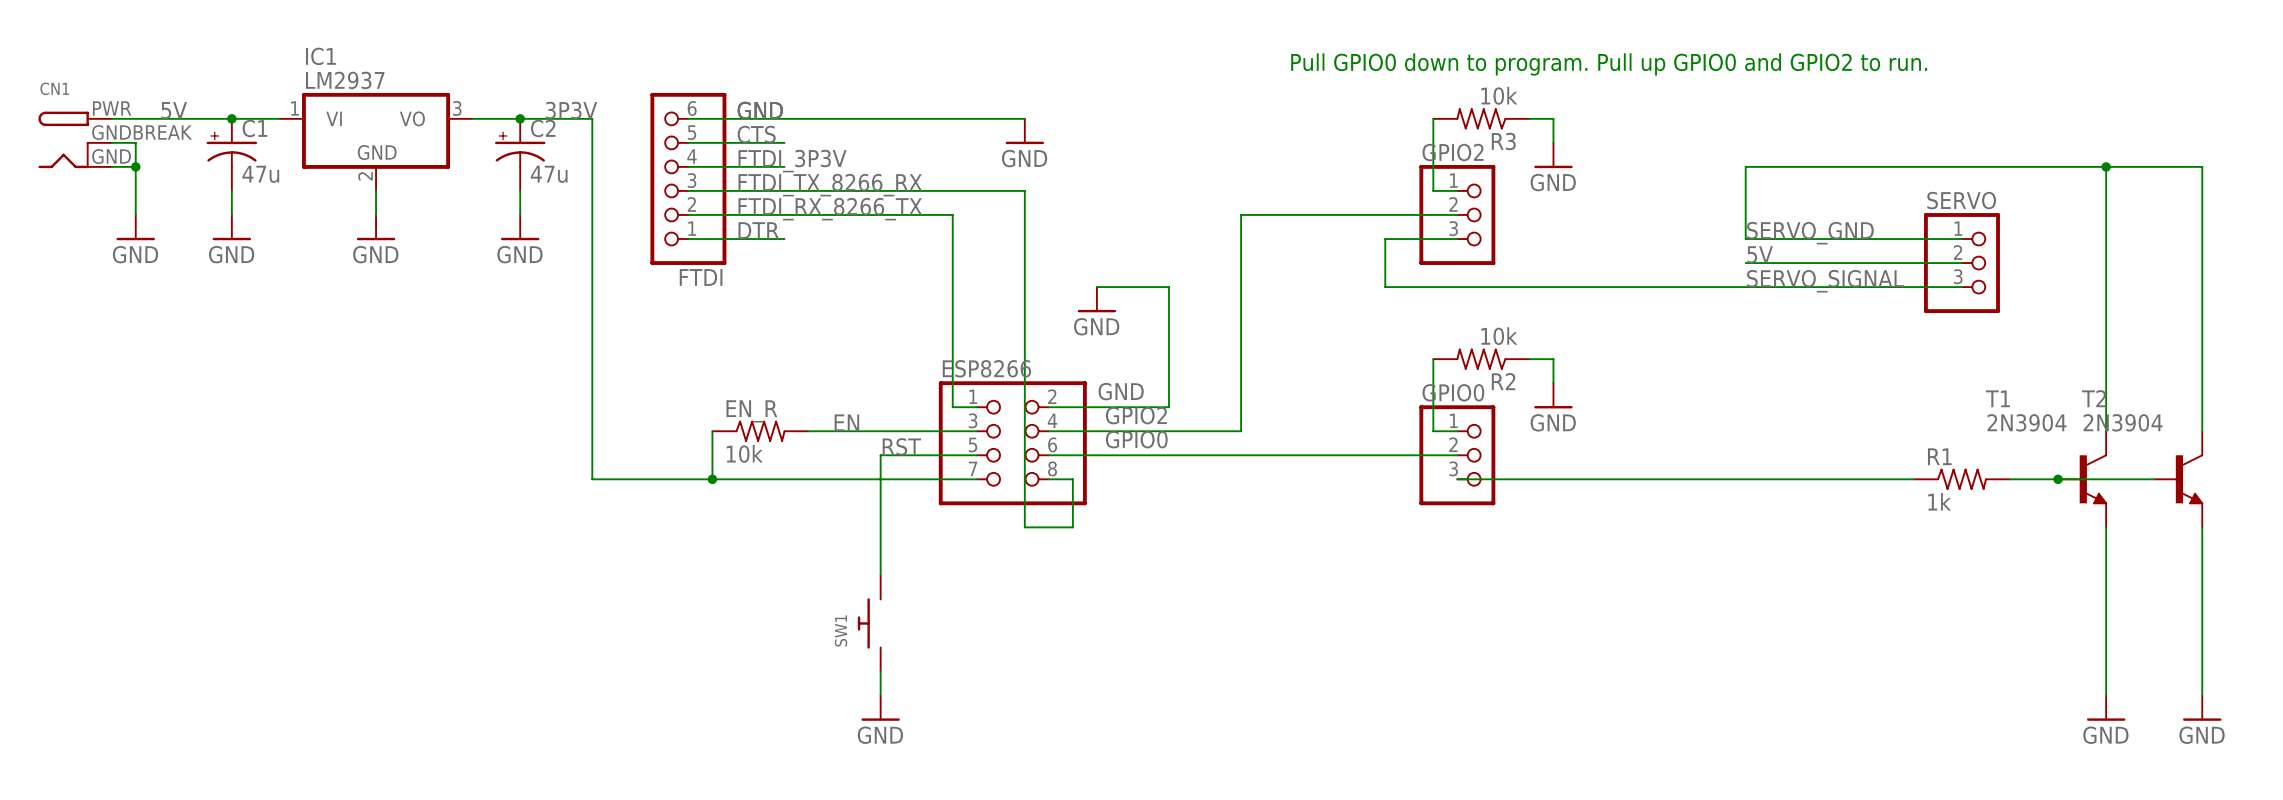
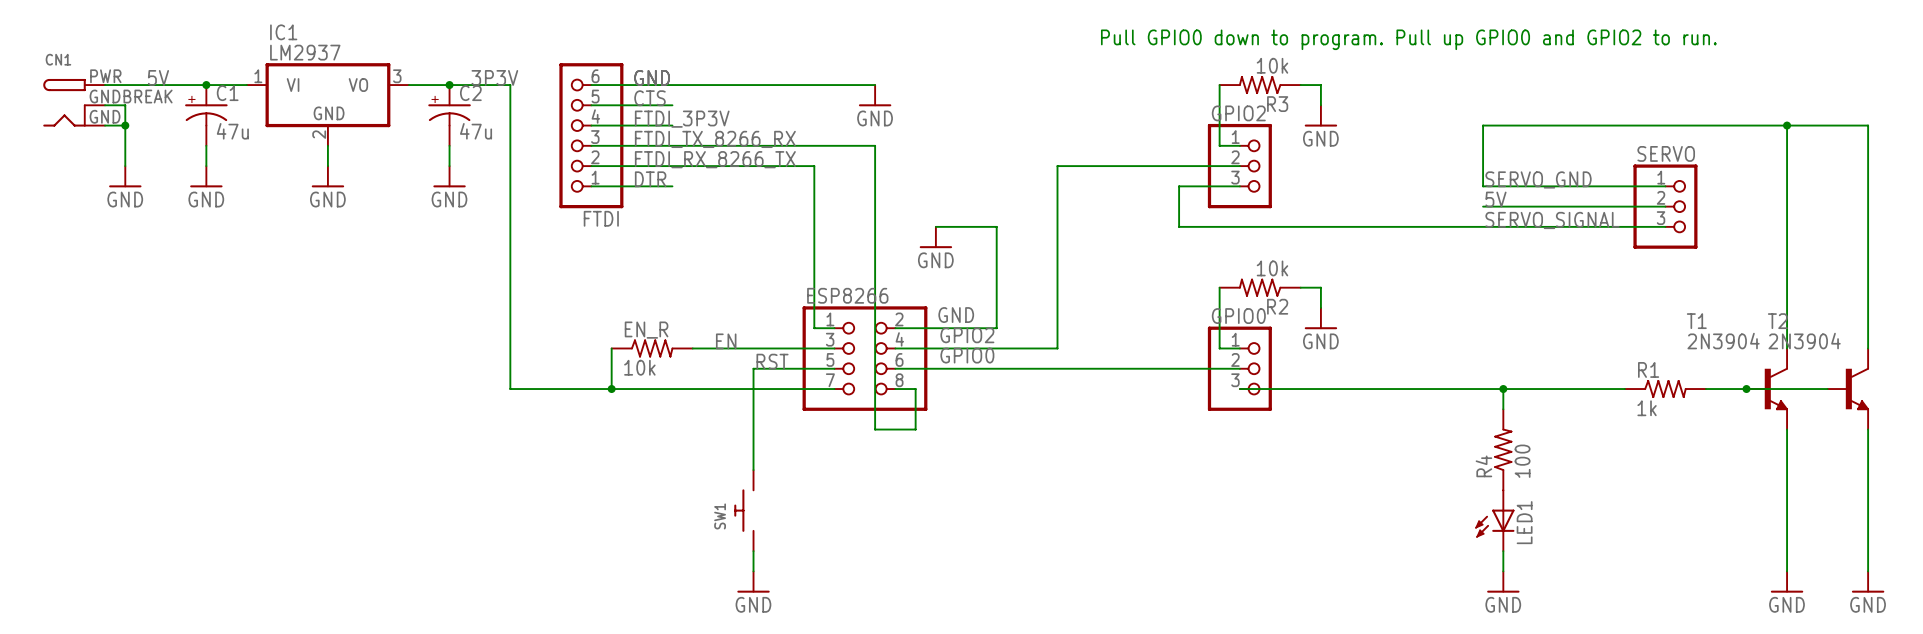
wire: none -> (1503, 389) (1503, 409)
junction: none -> (1503, 389)
R4: none -> 100 (1503, 449)
LED1: none -> (1494, 520)
wire: none -> (1503, 551) (1503, 571)
power symbol: none -> GND (1503, 582)

